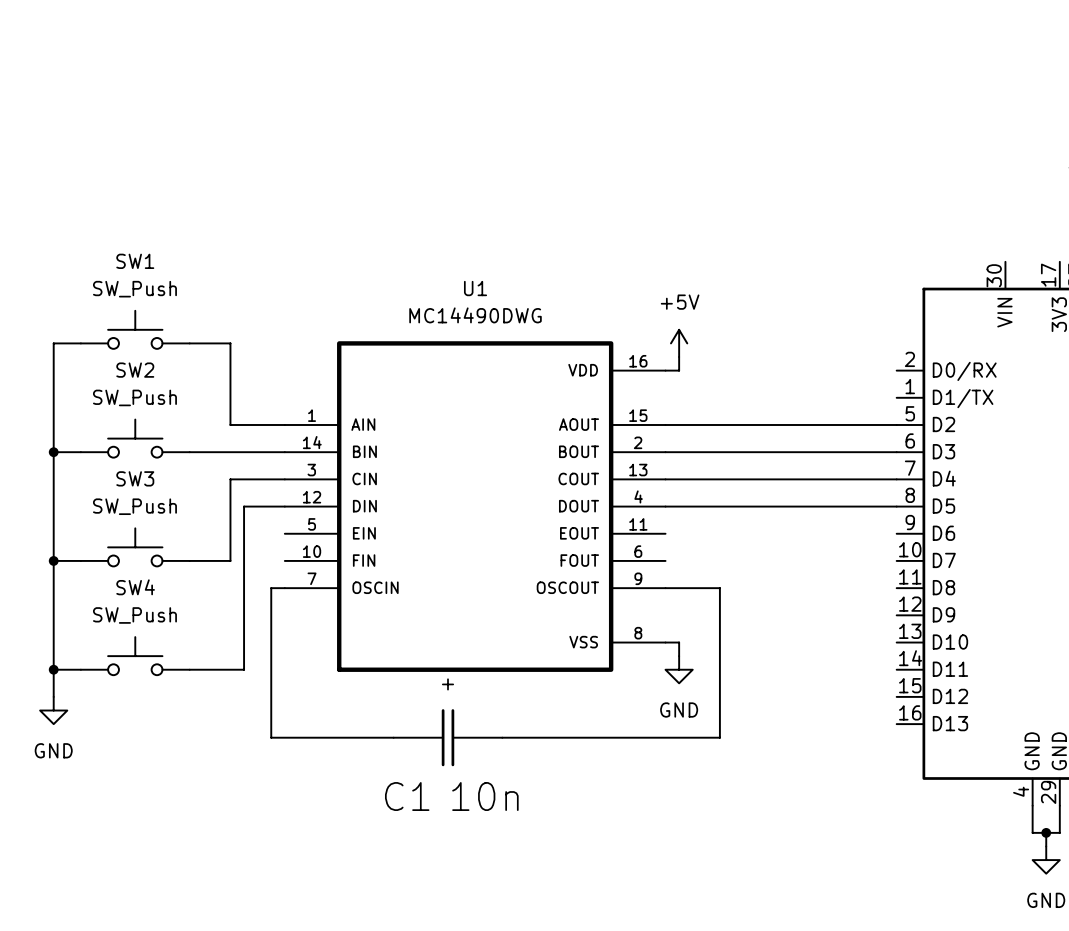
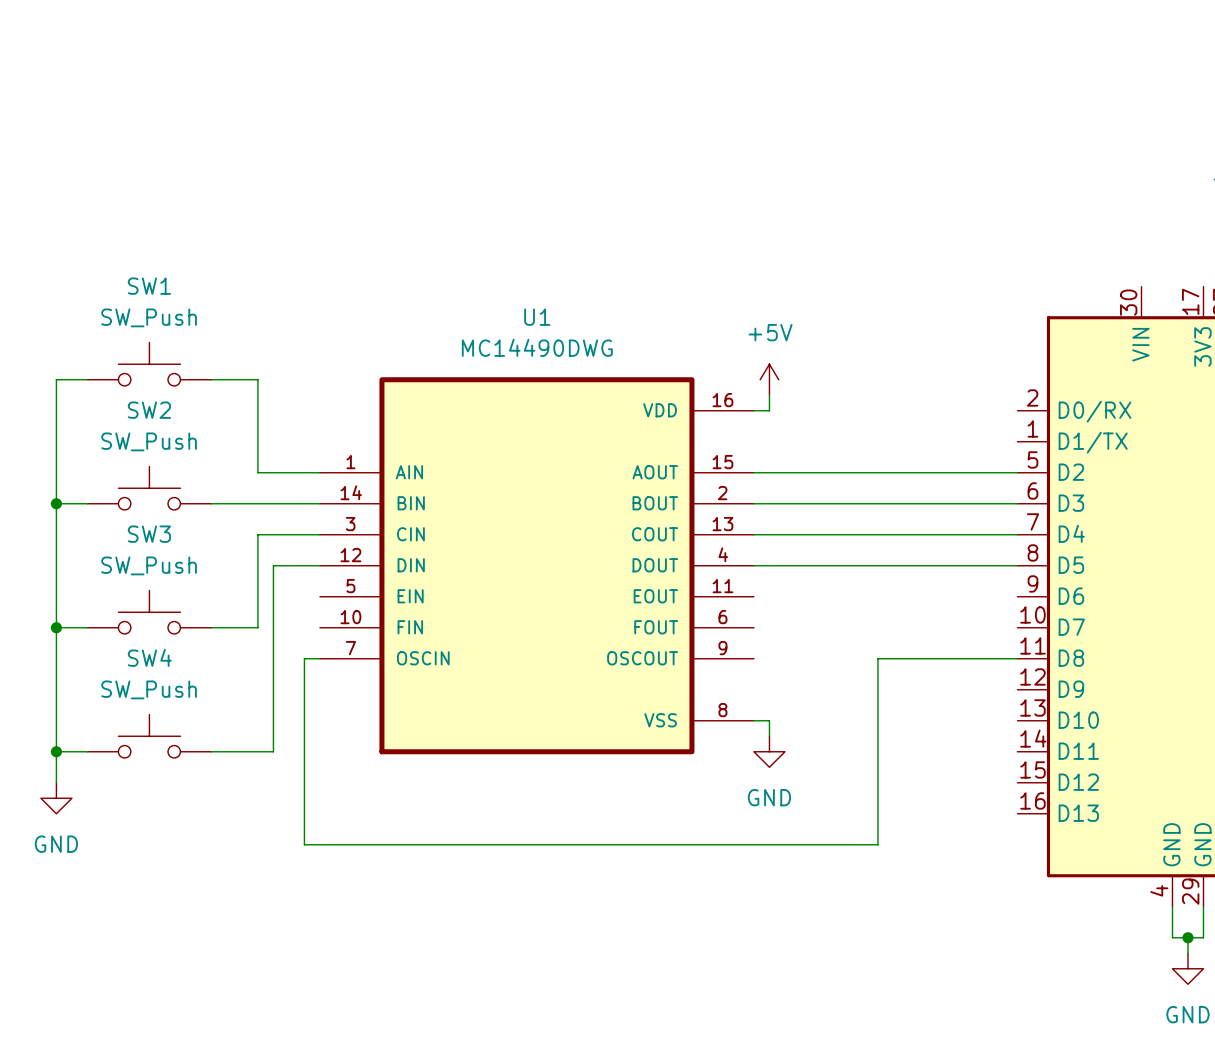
wire: (665, 588) (719, 588) (719, 737) (502, 737) -> none
wire: (271, 737) (393, 737) -> (304, 829) (304, 844) (877, 844) (877, 658) (1017, 658)
C1: 10n (448, 737) -> none

